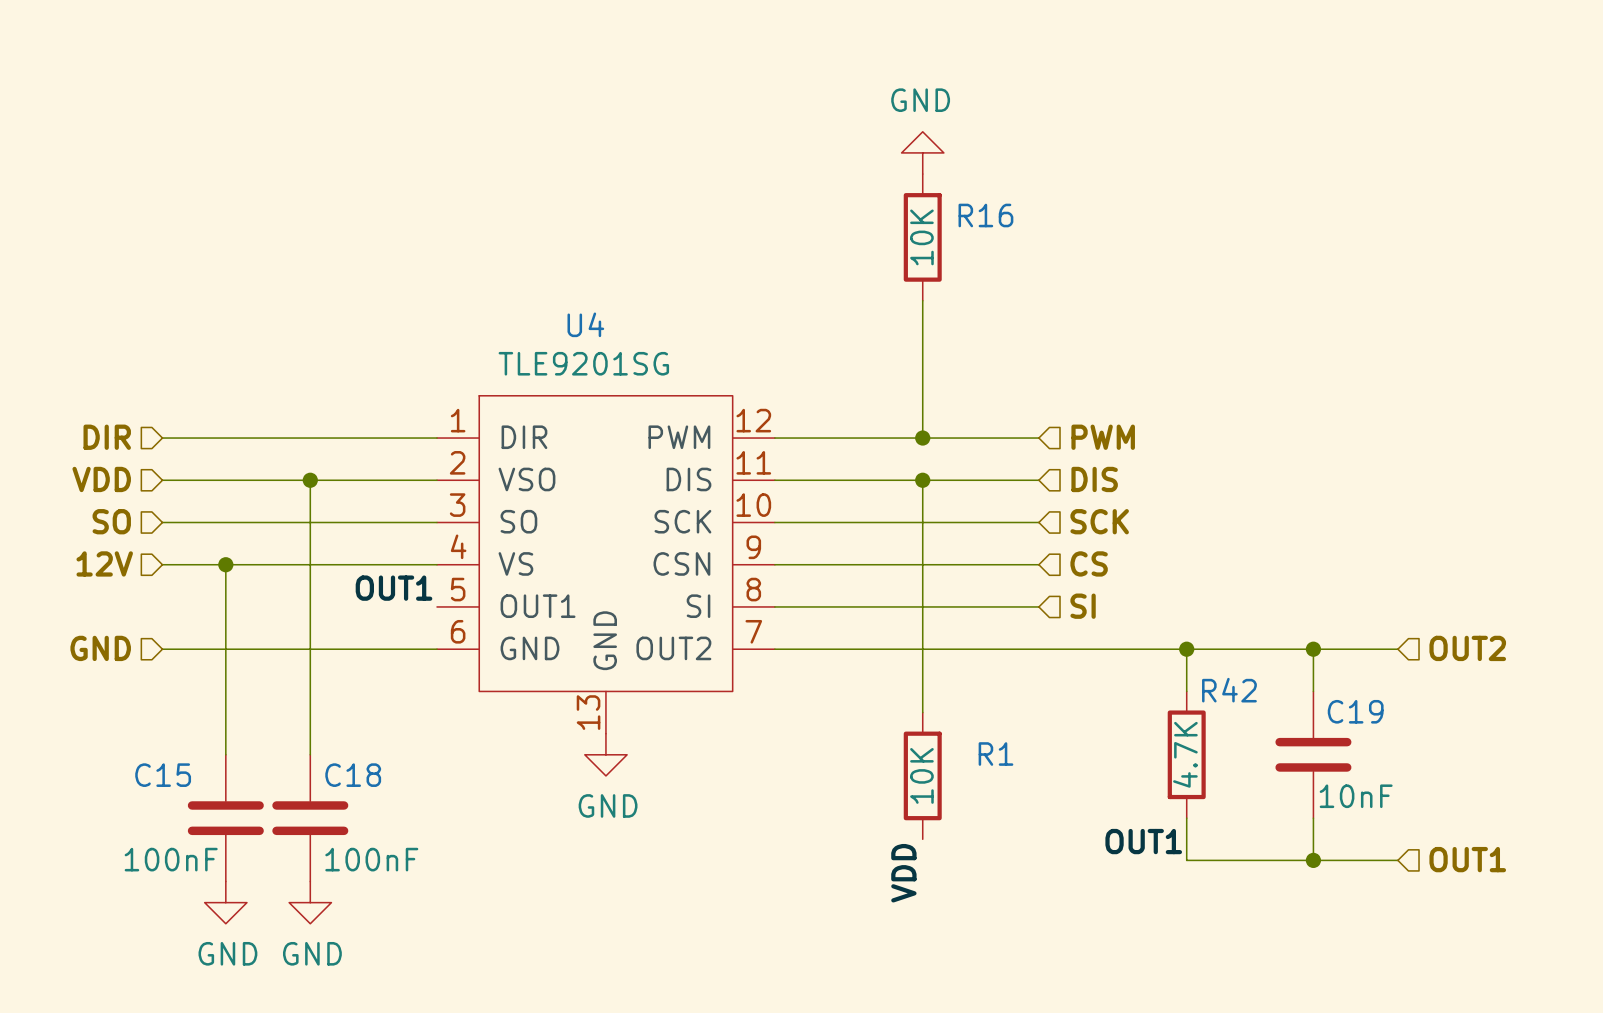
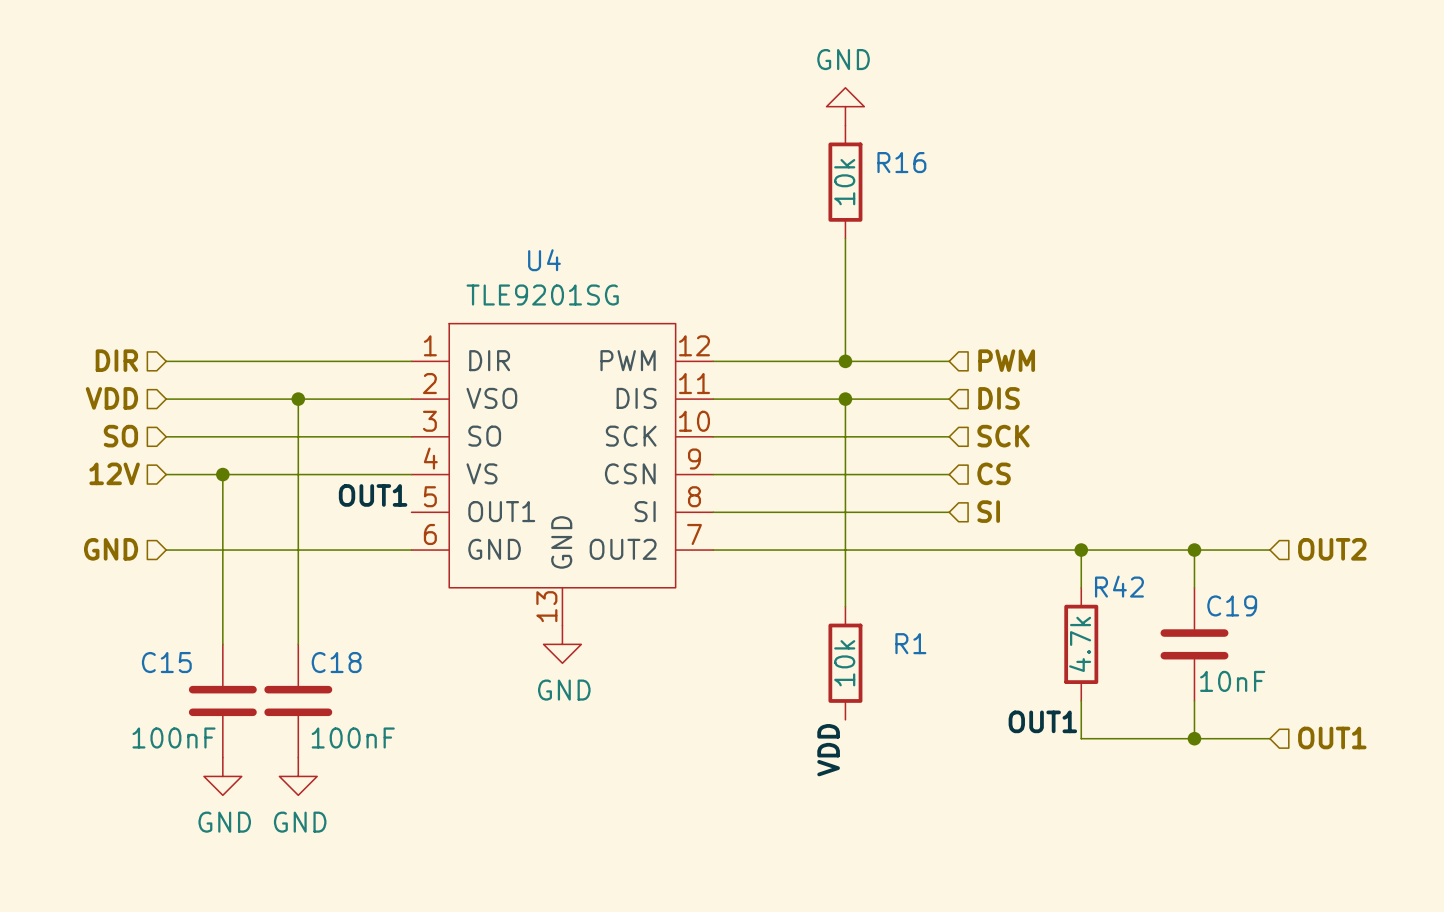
R16 value: 10K (921, 237) -> 10k (844, 182)
R42 value: 4.7K (1185, 754) -> 4.7k (1080, 644)
R1 value: 10K (921, 775) -> 10k (844, 663)

